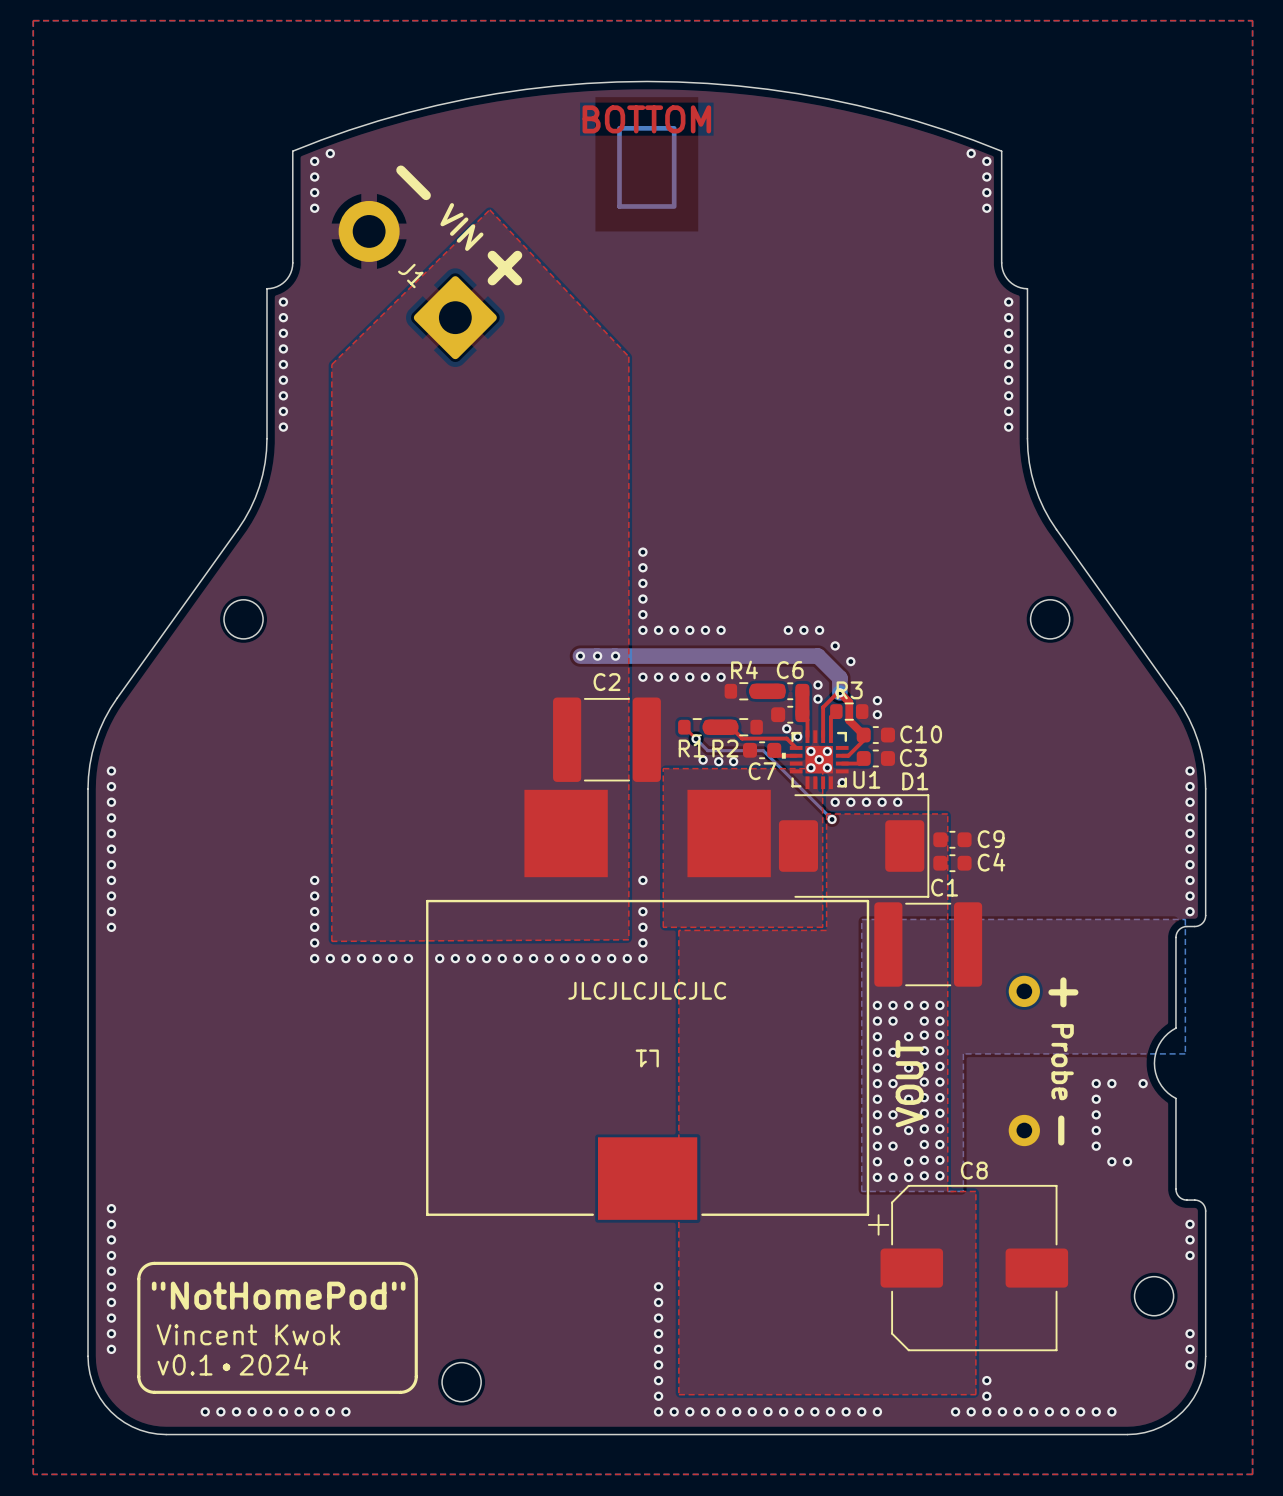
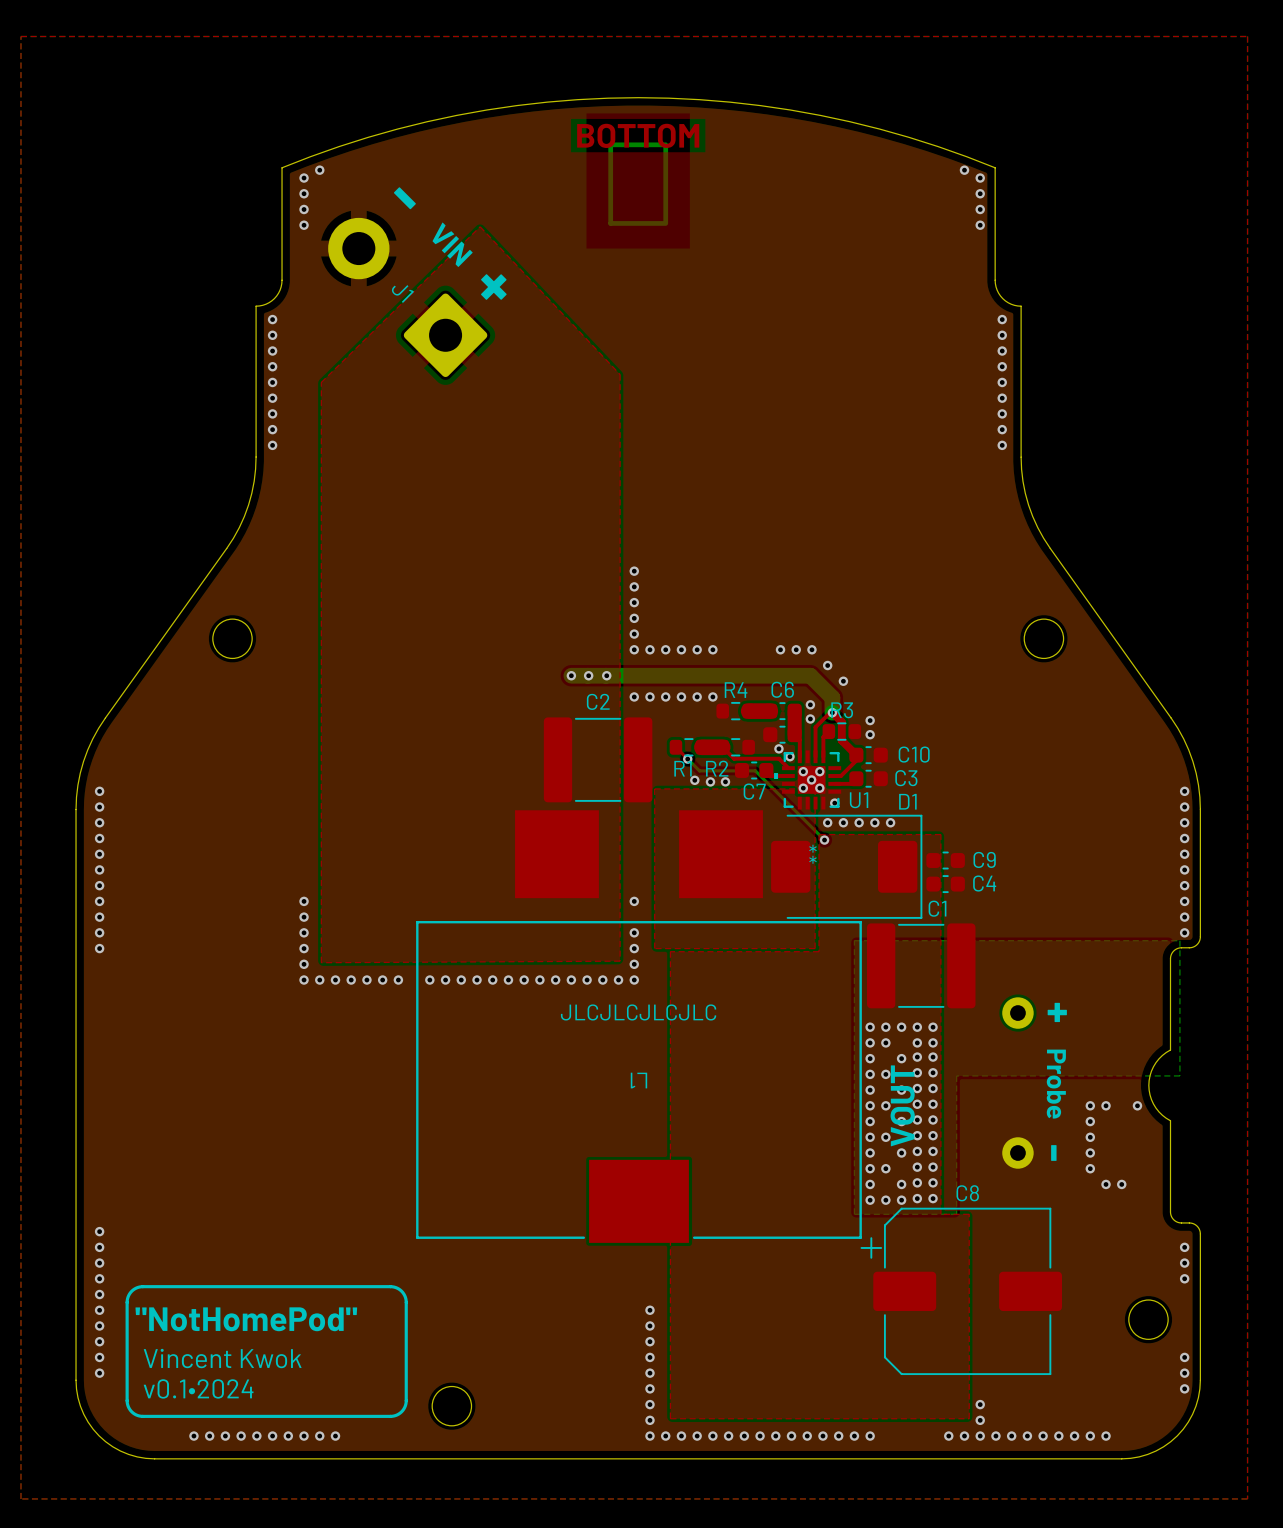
L1 footprint: [426, 789, 870, 1220] -> [416, 810, 862, 1243]

